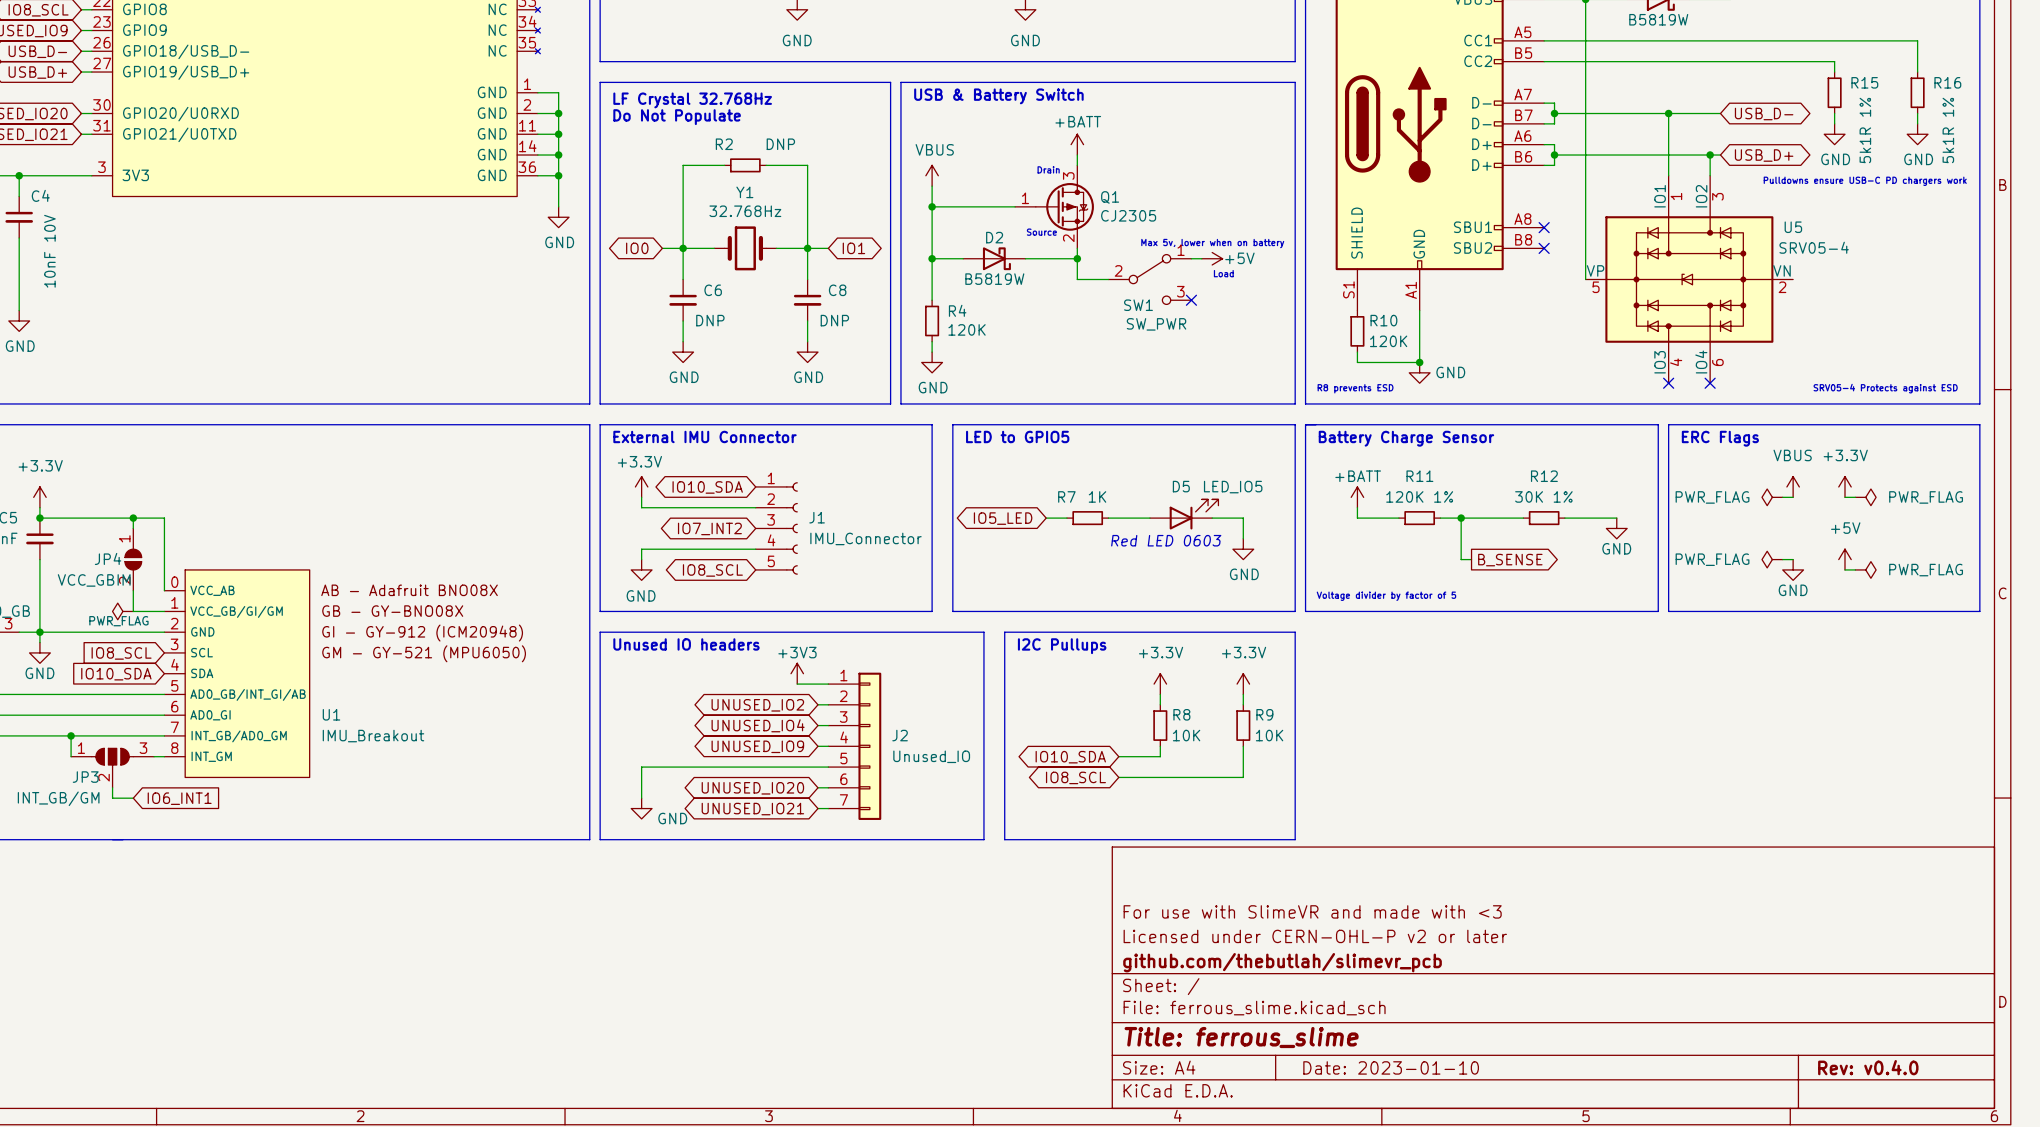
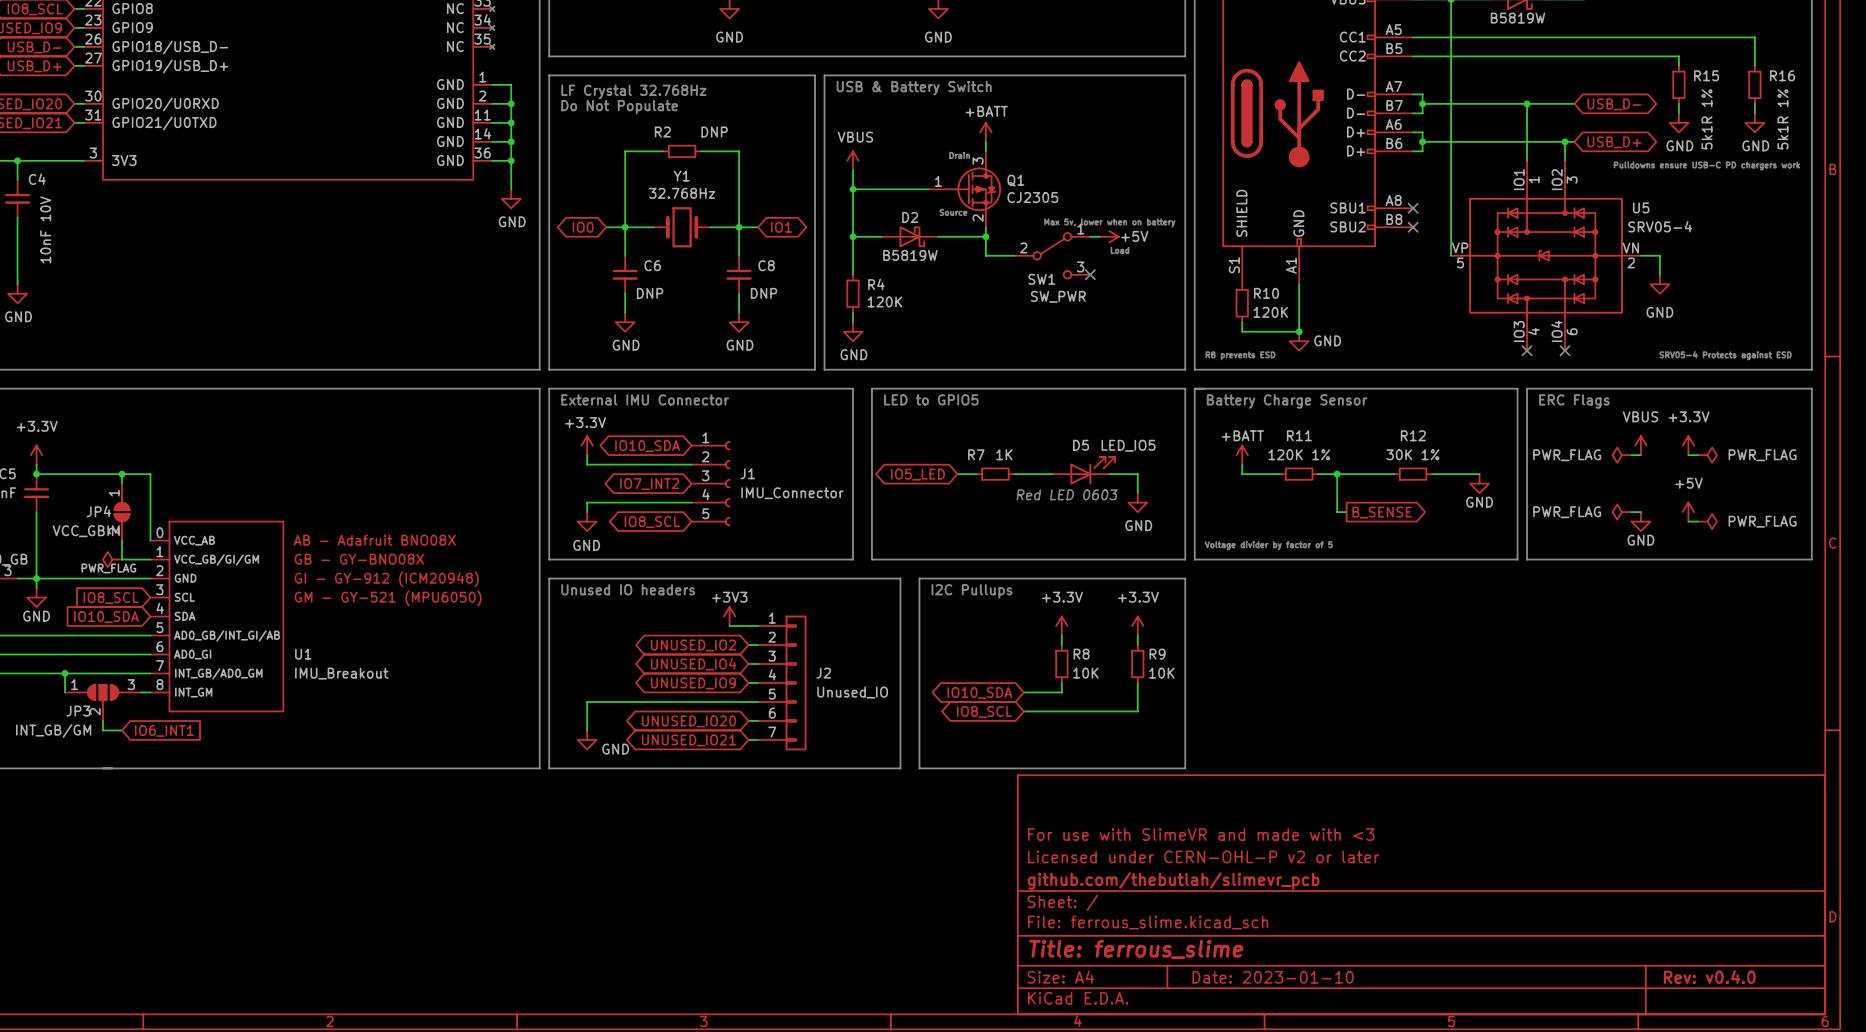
wire: none -> (1640, 255) (1659, 255) (1659, 274)
power symbol: none -> GND (1659, 284)

